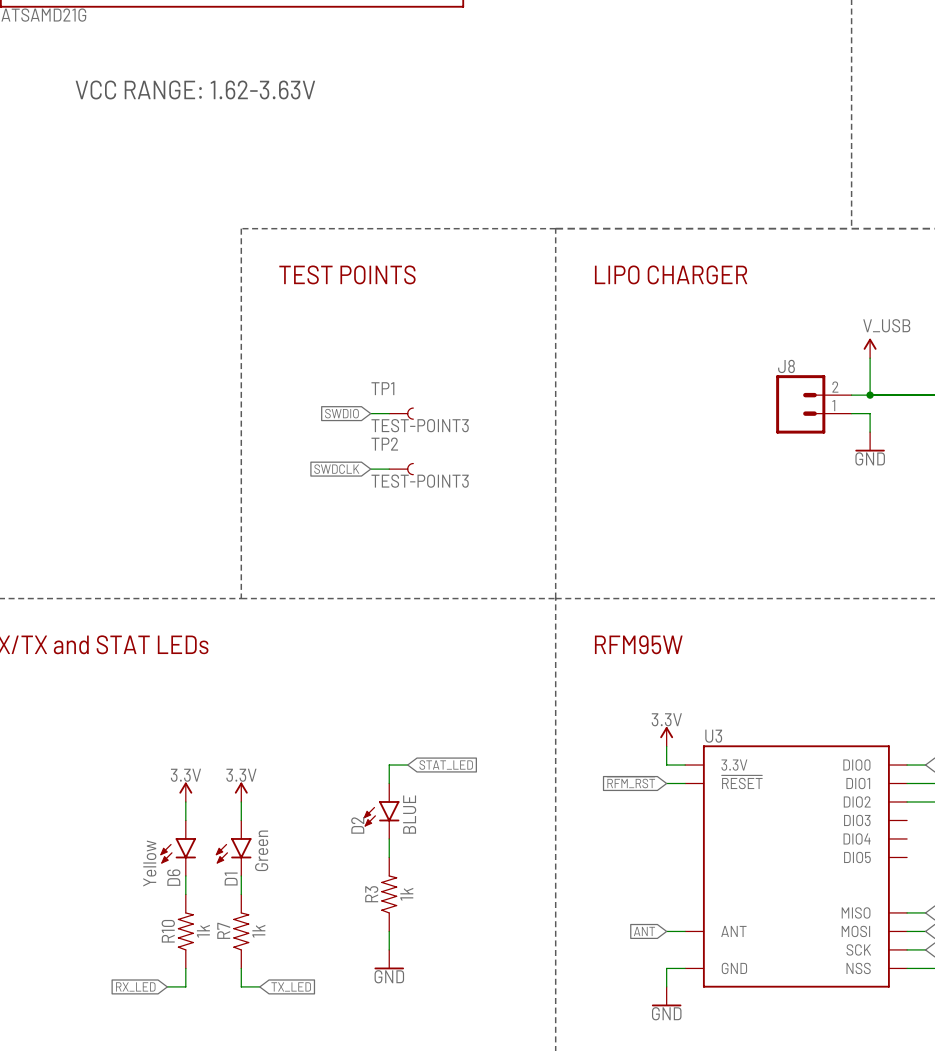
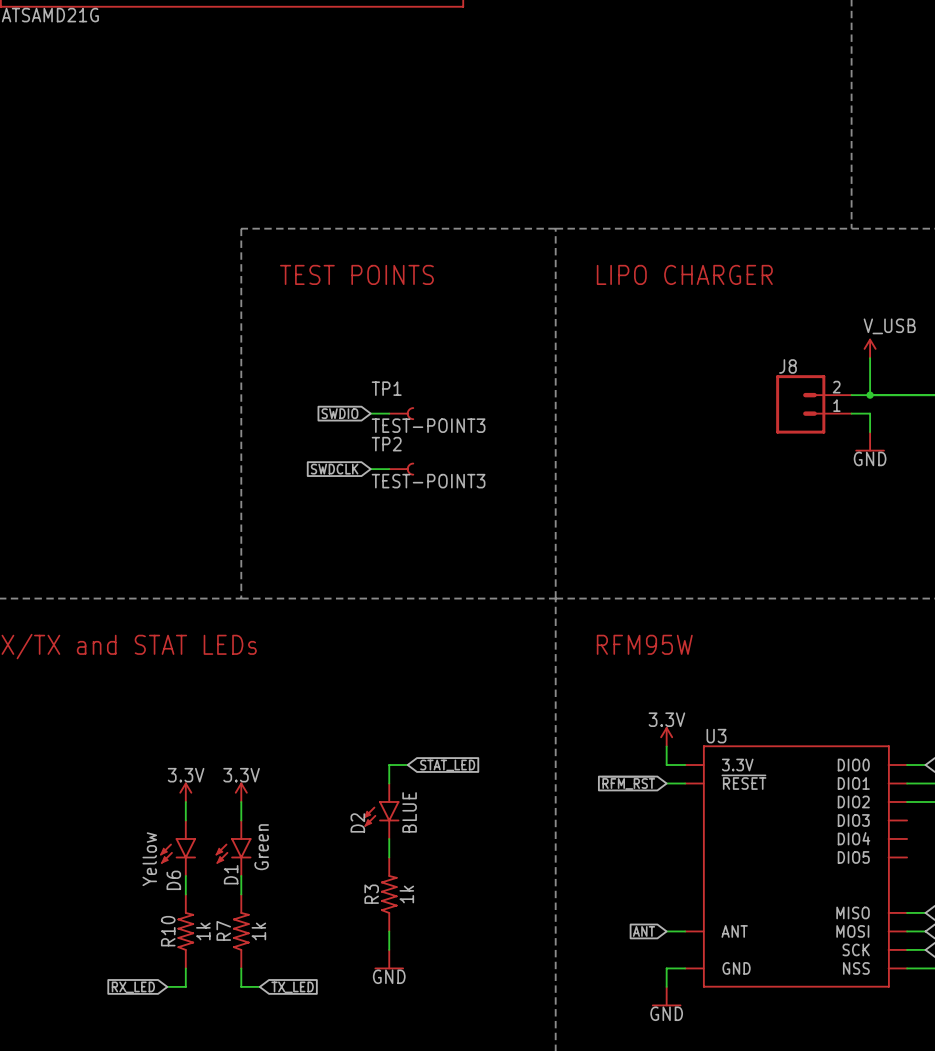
text: VCC RANGE: 1.62-3.63V (195, 90) -> none

